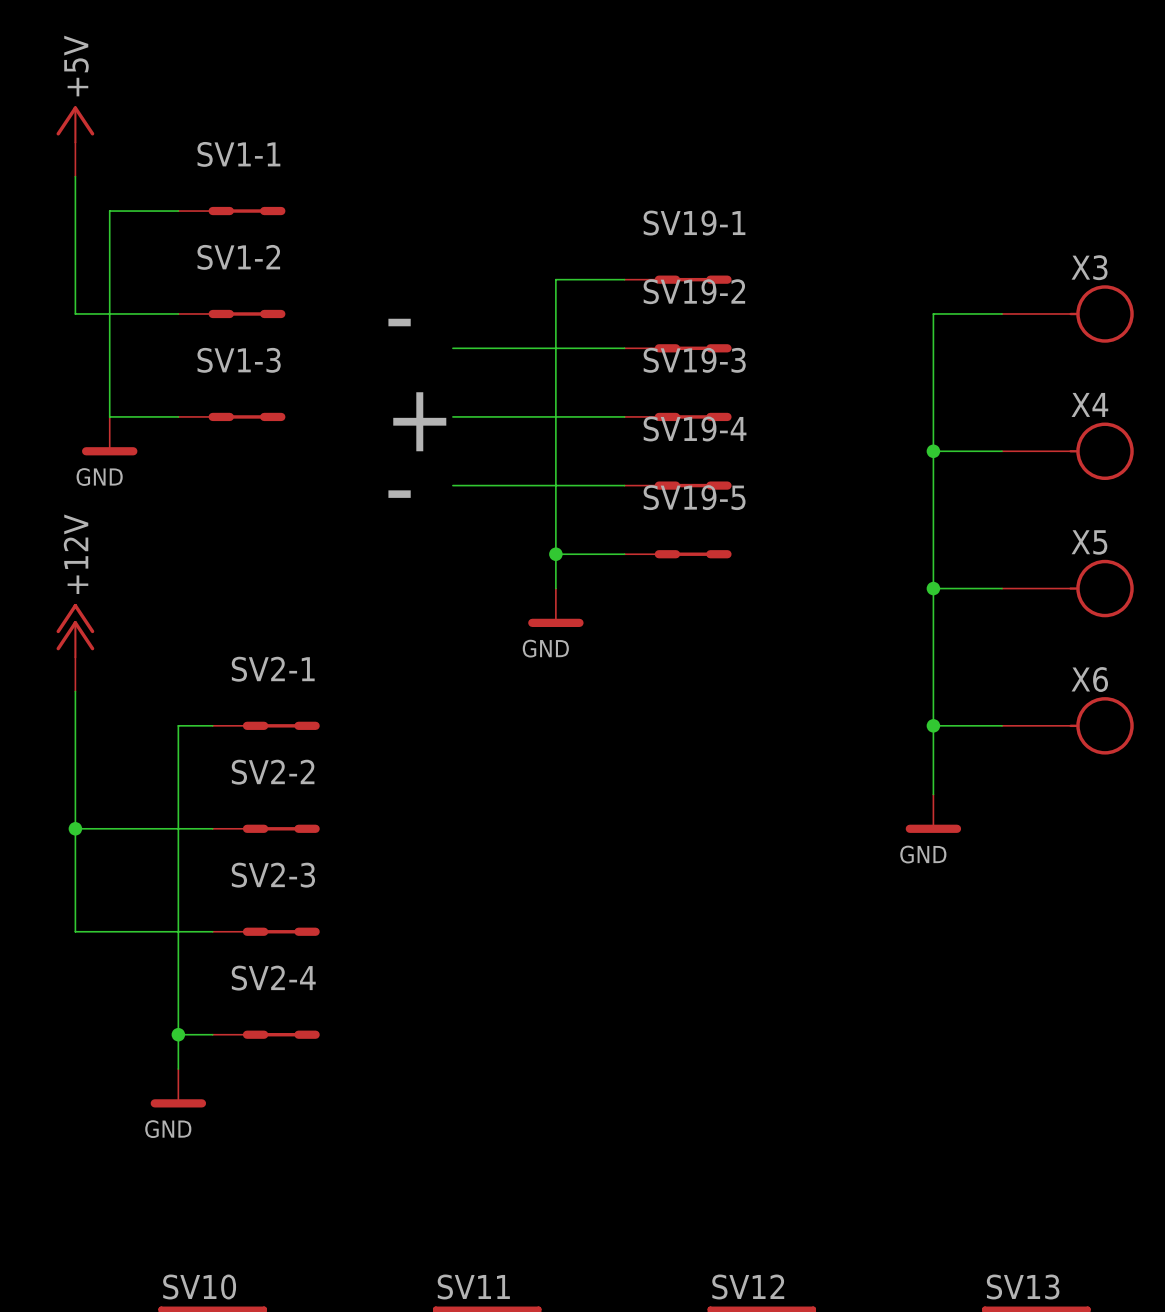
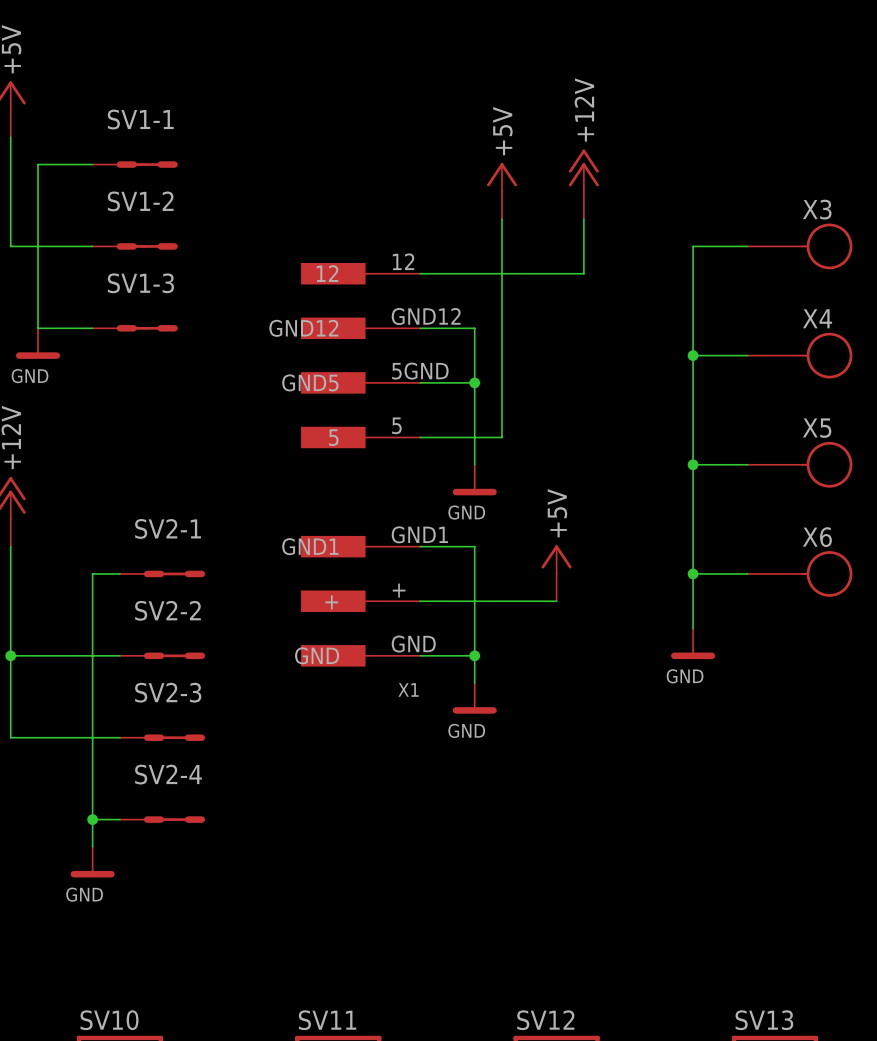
power symbol: none -> +12V (583, 184)
power symbol: none -> +5V (502, 191)
wire: (624, 279) (555, 279) (555, 588) -> none
SV19-1: (678, 279) -> none
wire: none -> (502, 219) (502, 437) (447, 437)
wire: none -> (583, 219) (583, 273) (447, 273)
text: - (399, 322) -> none
SV19-2: (678, 348) -> none
wire: none -> (447, 328) (474, 328) (474, 464)
SV19-3: (678, 416) -> none
text: + (419, 421) -> none
part: none -> (360, 355)
junction: none -> (474, 382)
SV19-4: (678, 485) -> none
text: - (399, 494) -> none
junction: (555, 554) -> none
SV19-5: (678, 554) -> none
power symbol position: (555, 607) -> (474, 480)
wire: none -> (420, 546) (474, 546) (474, 683)
power symbol: none -> +5V (556, 573)
X1: none -> (360, 601)
wire: none -> (420, 601) (556, 601)
wire: none -> (420, 655) (474, 655)
junction: none -> (474, 655)
power symbol: none -> (474, 698)

